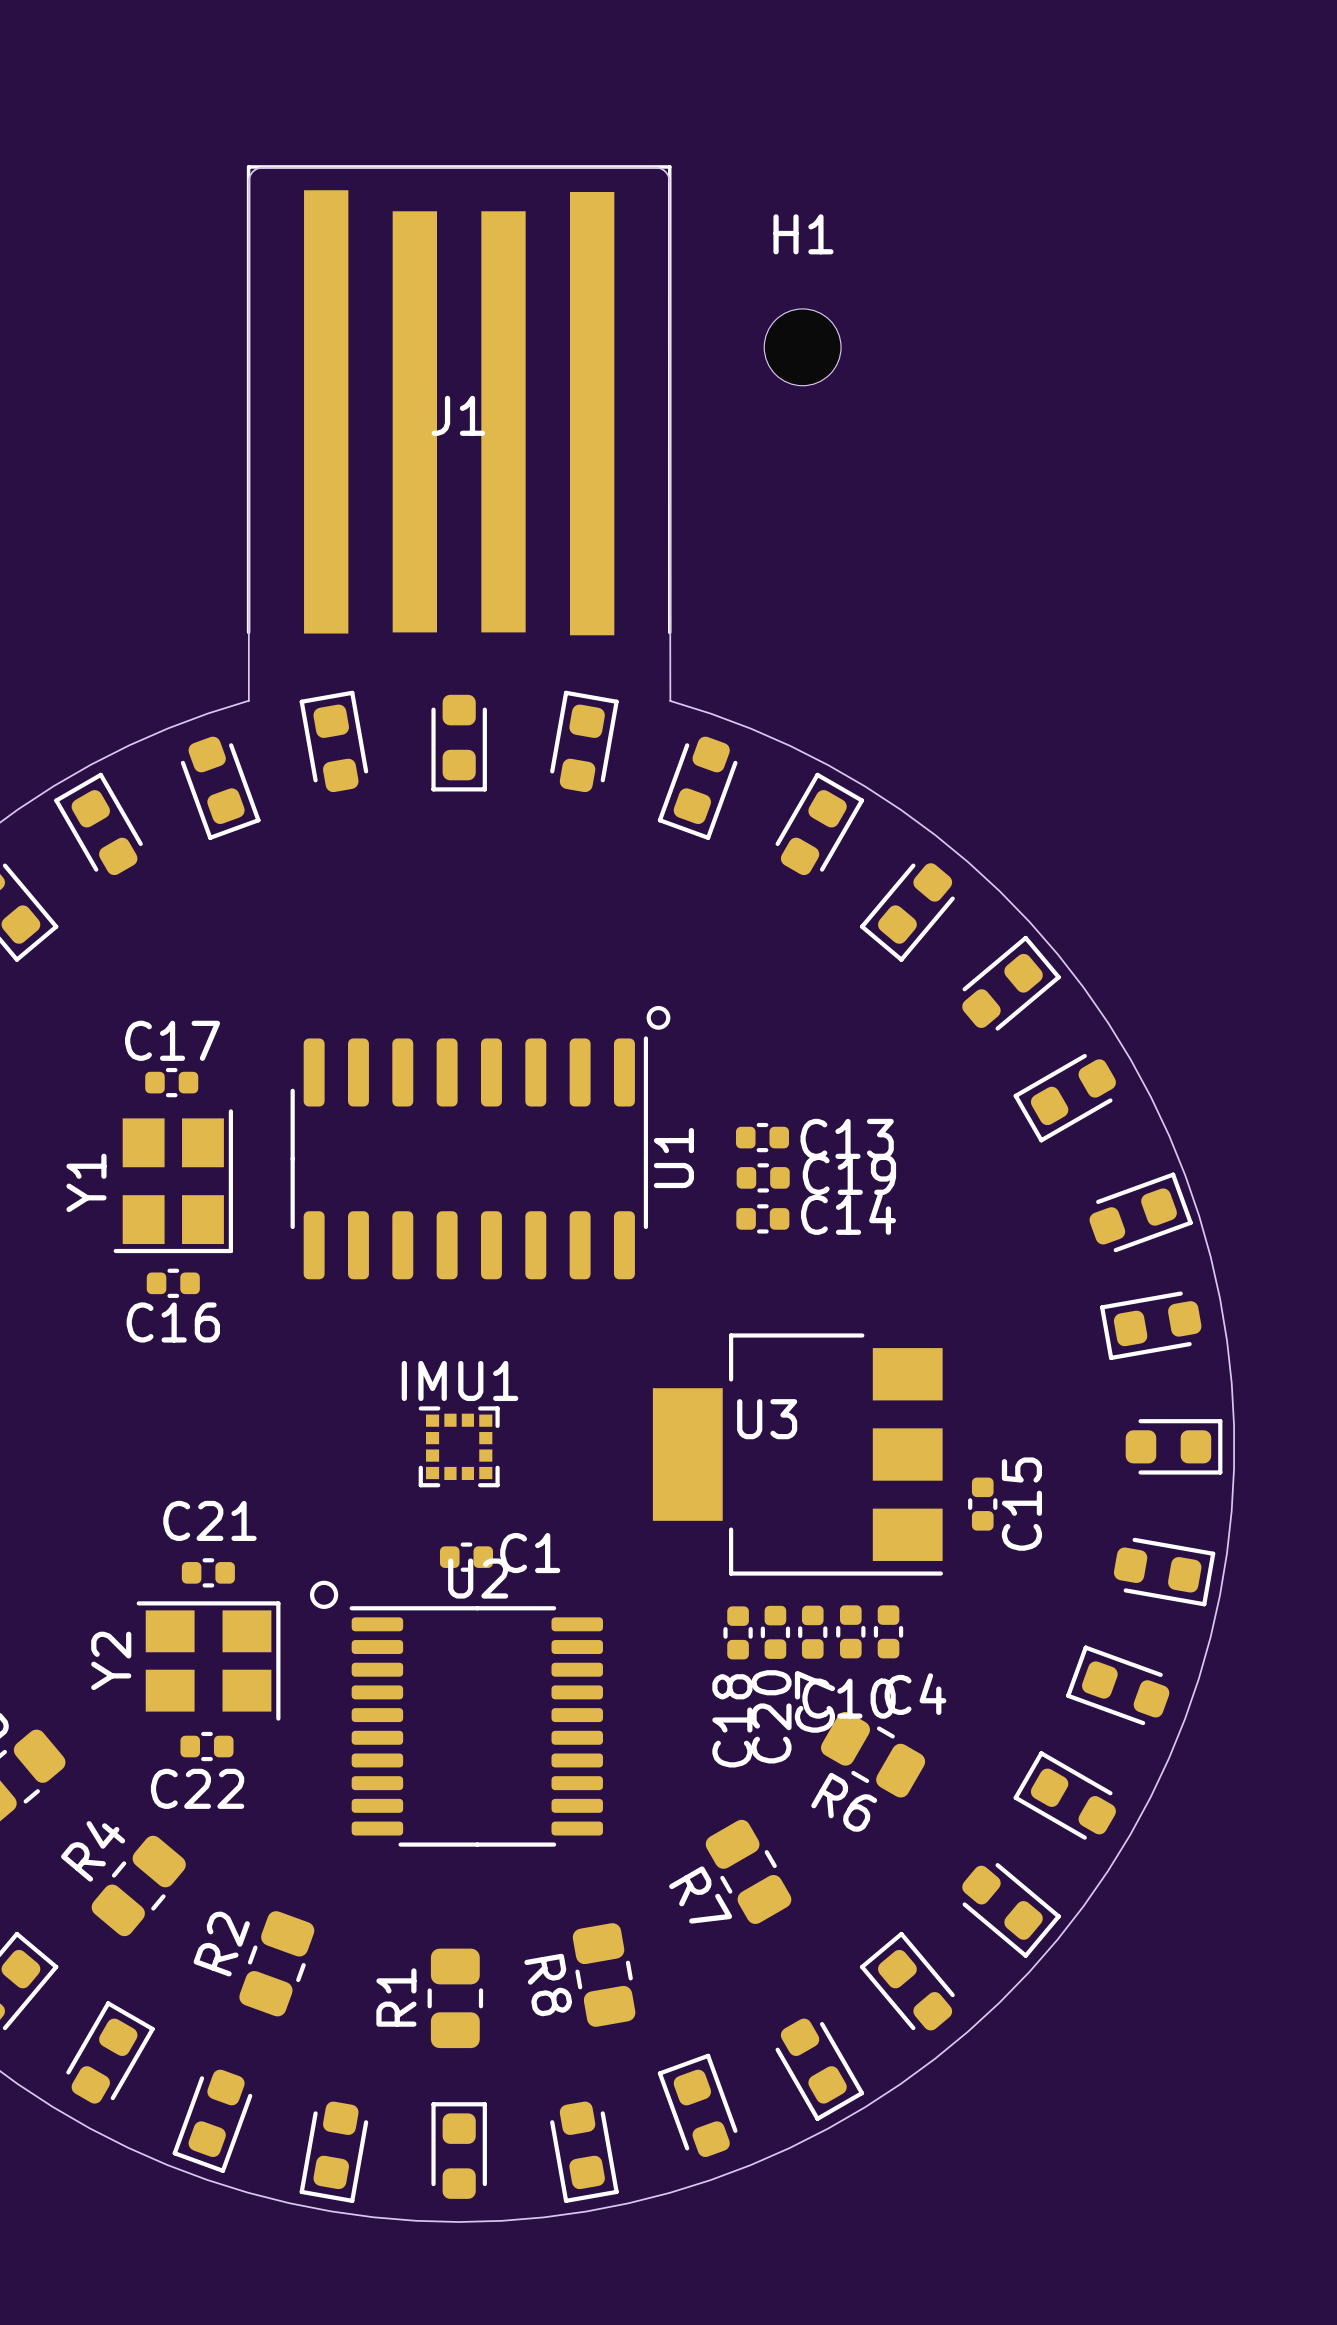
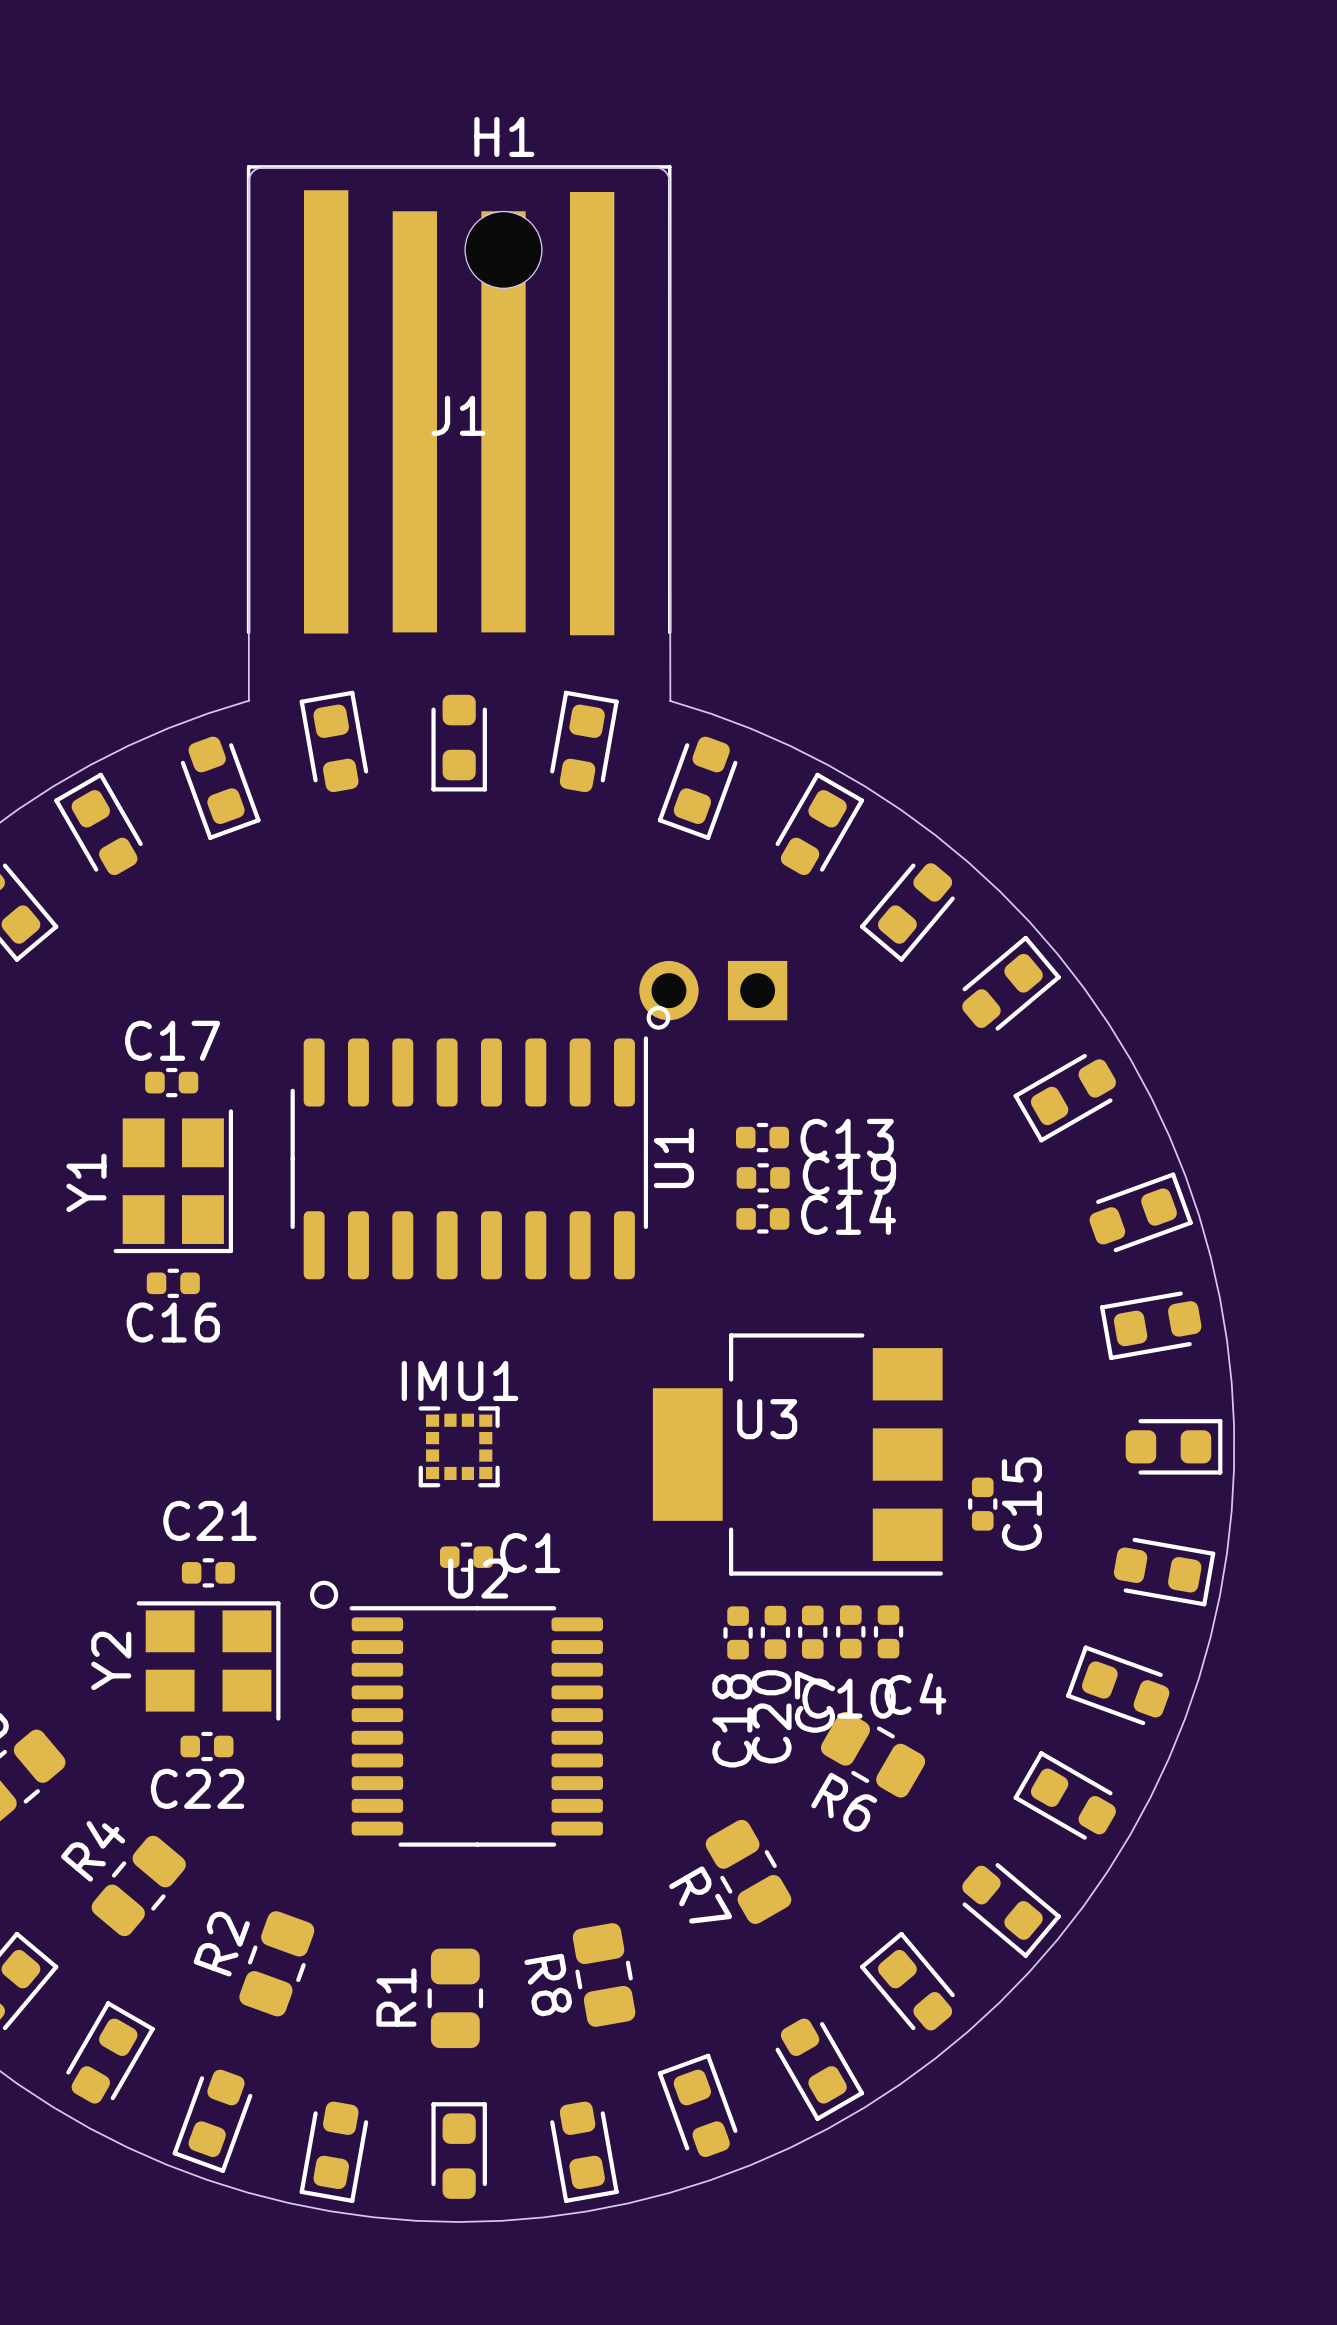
H1 position: (802, 347) -> (503, 249)
part: none -> (713, 990)

